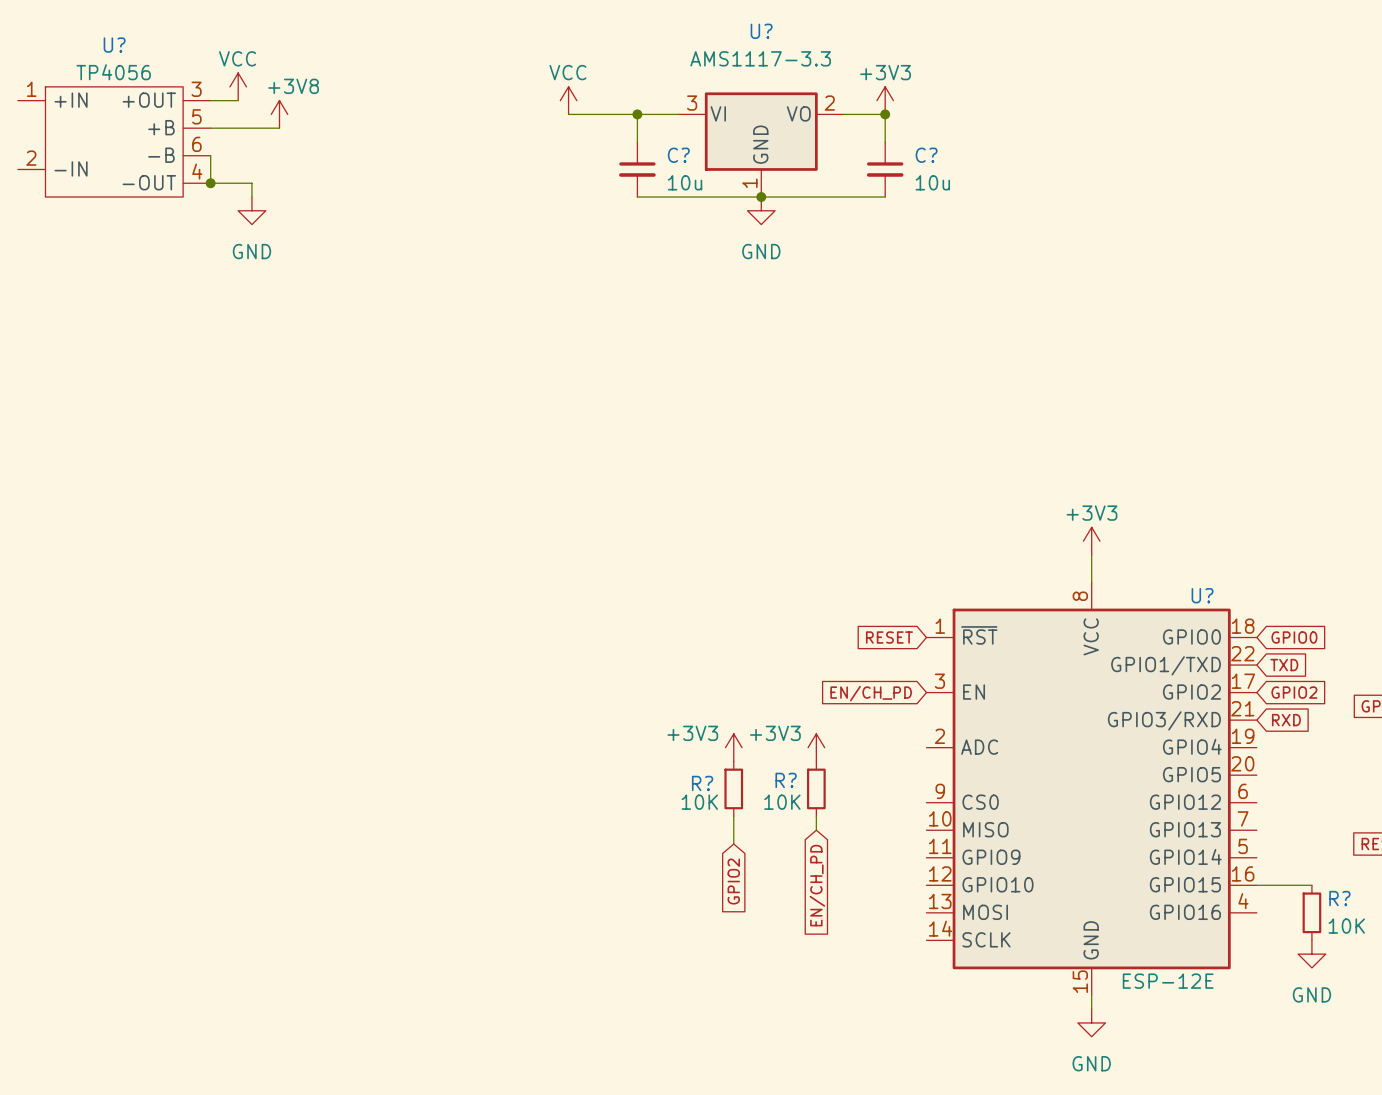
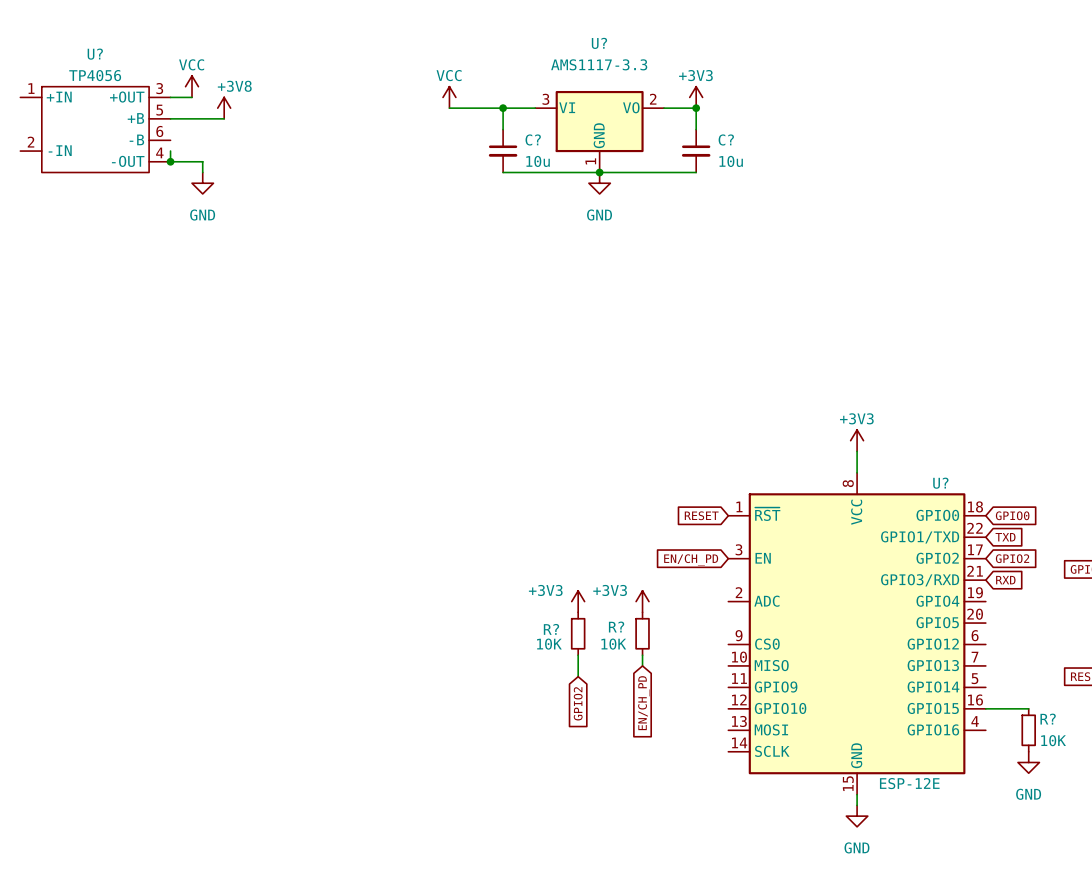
wire: (210, 155) (210, 169) -> none

